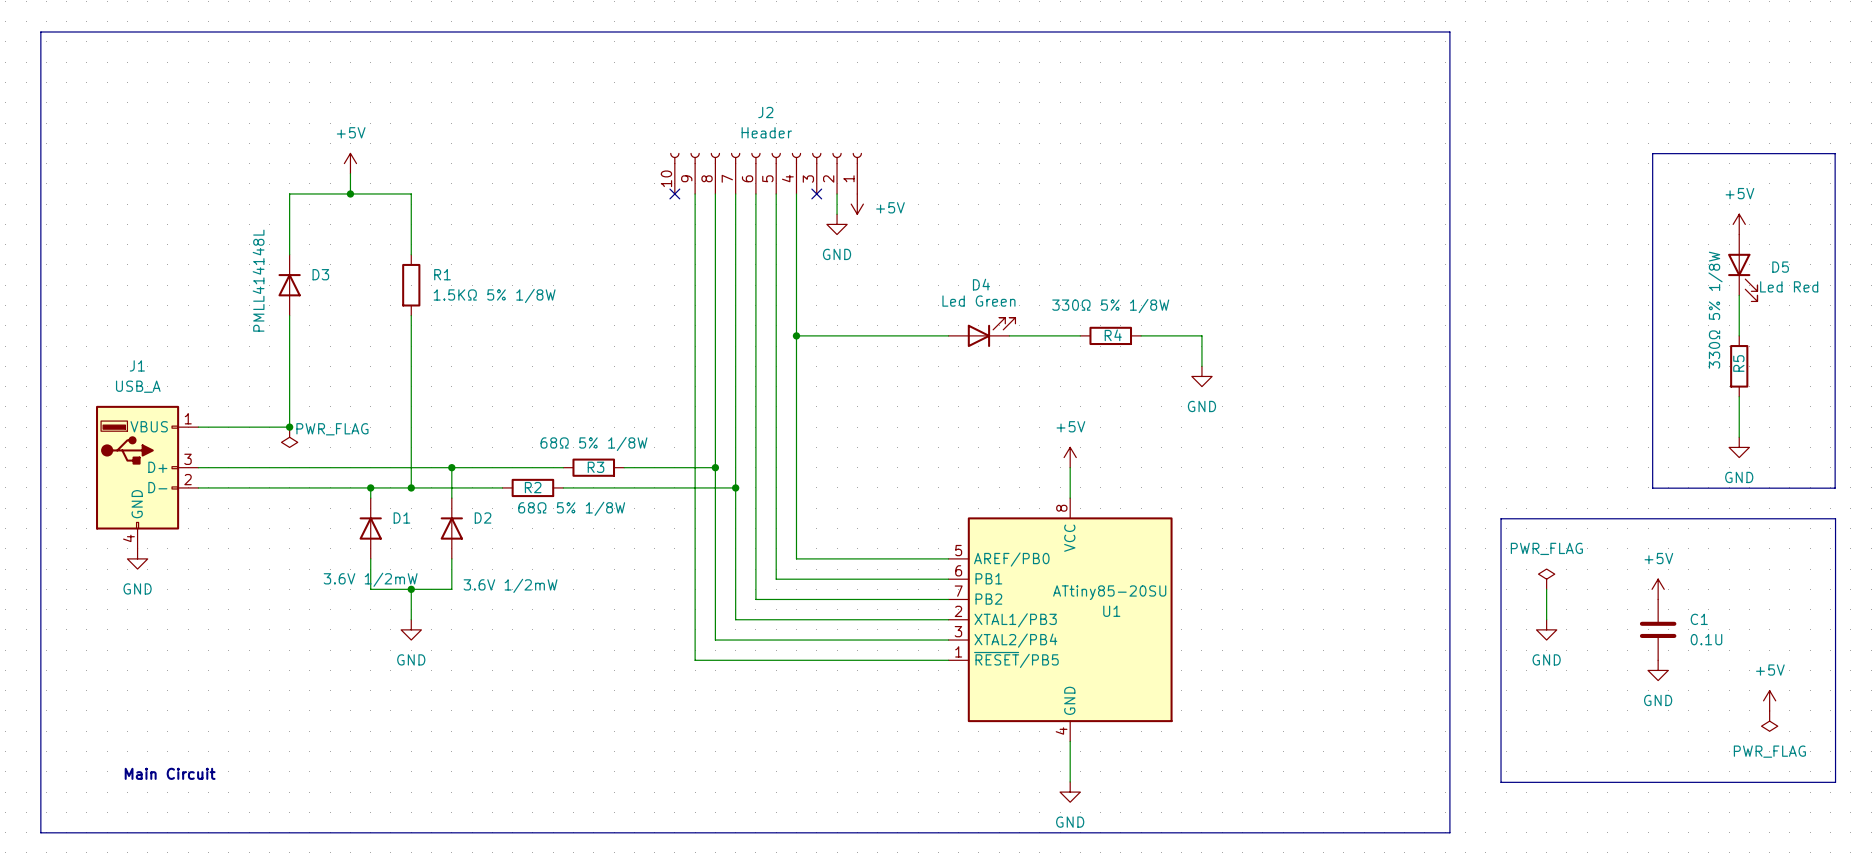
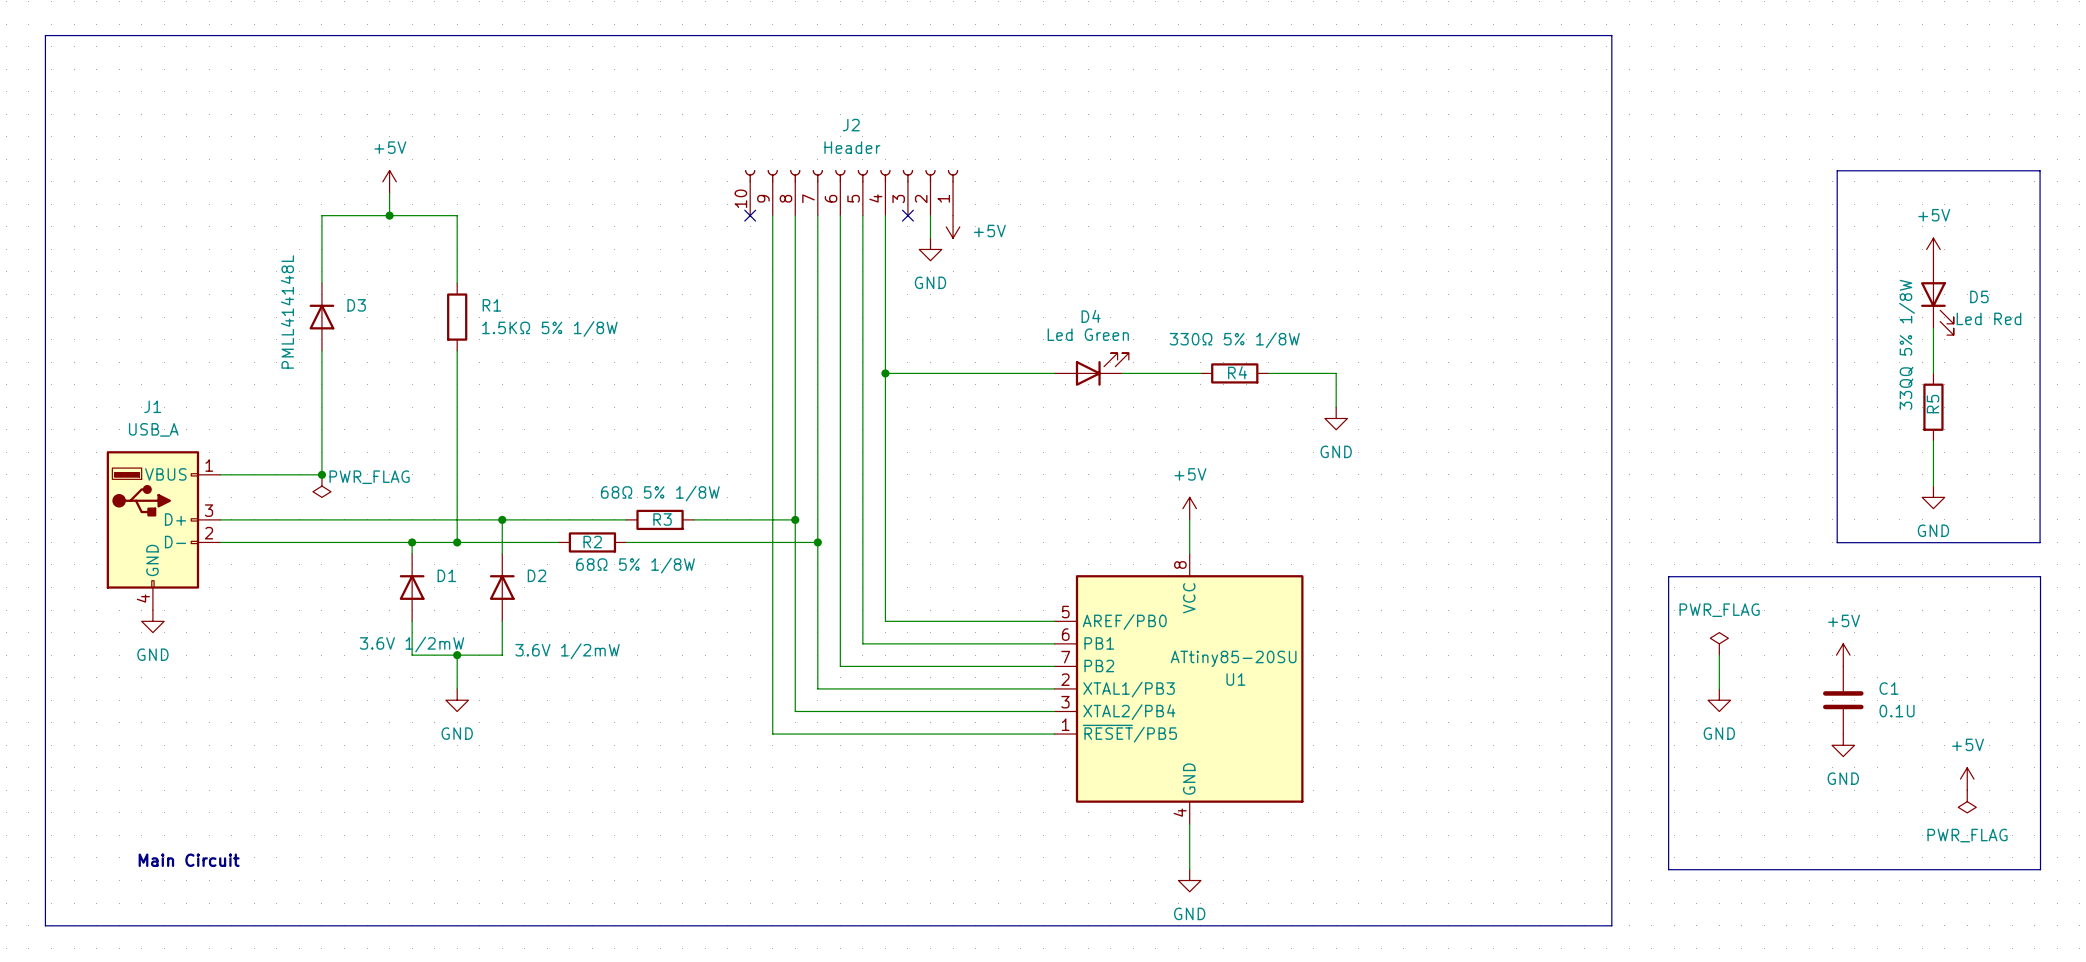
R5 value: 330Ω 5% 1/8W (1715, 310) -> 33QQ 5% 1/8W (1907, 344)

